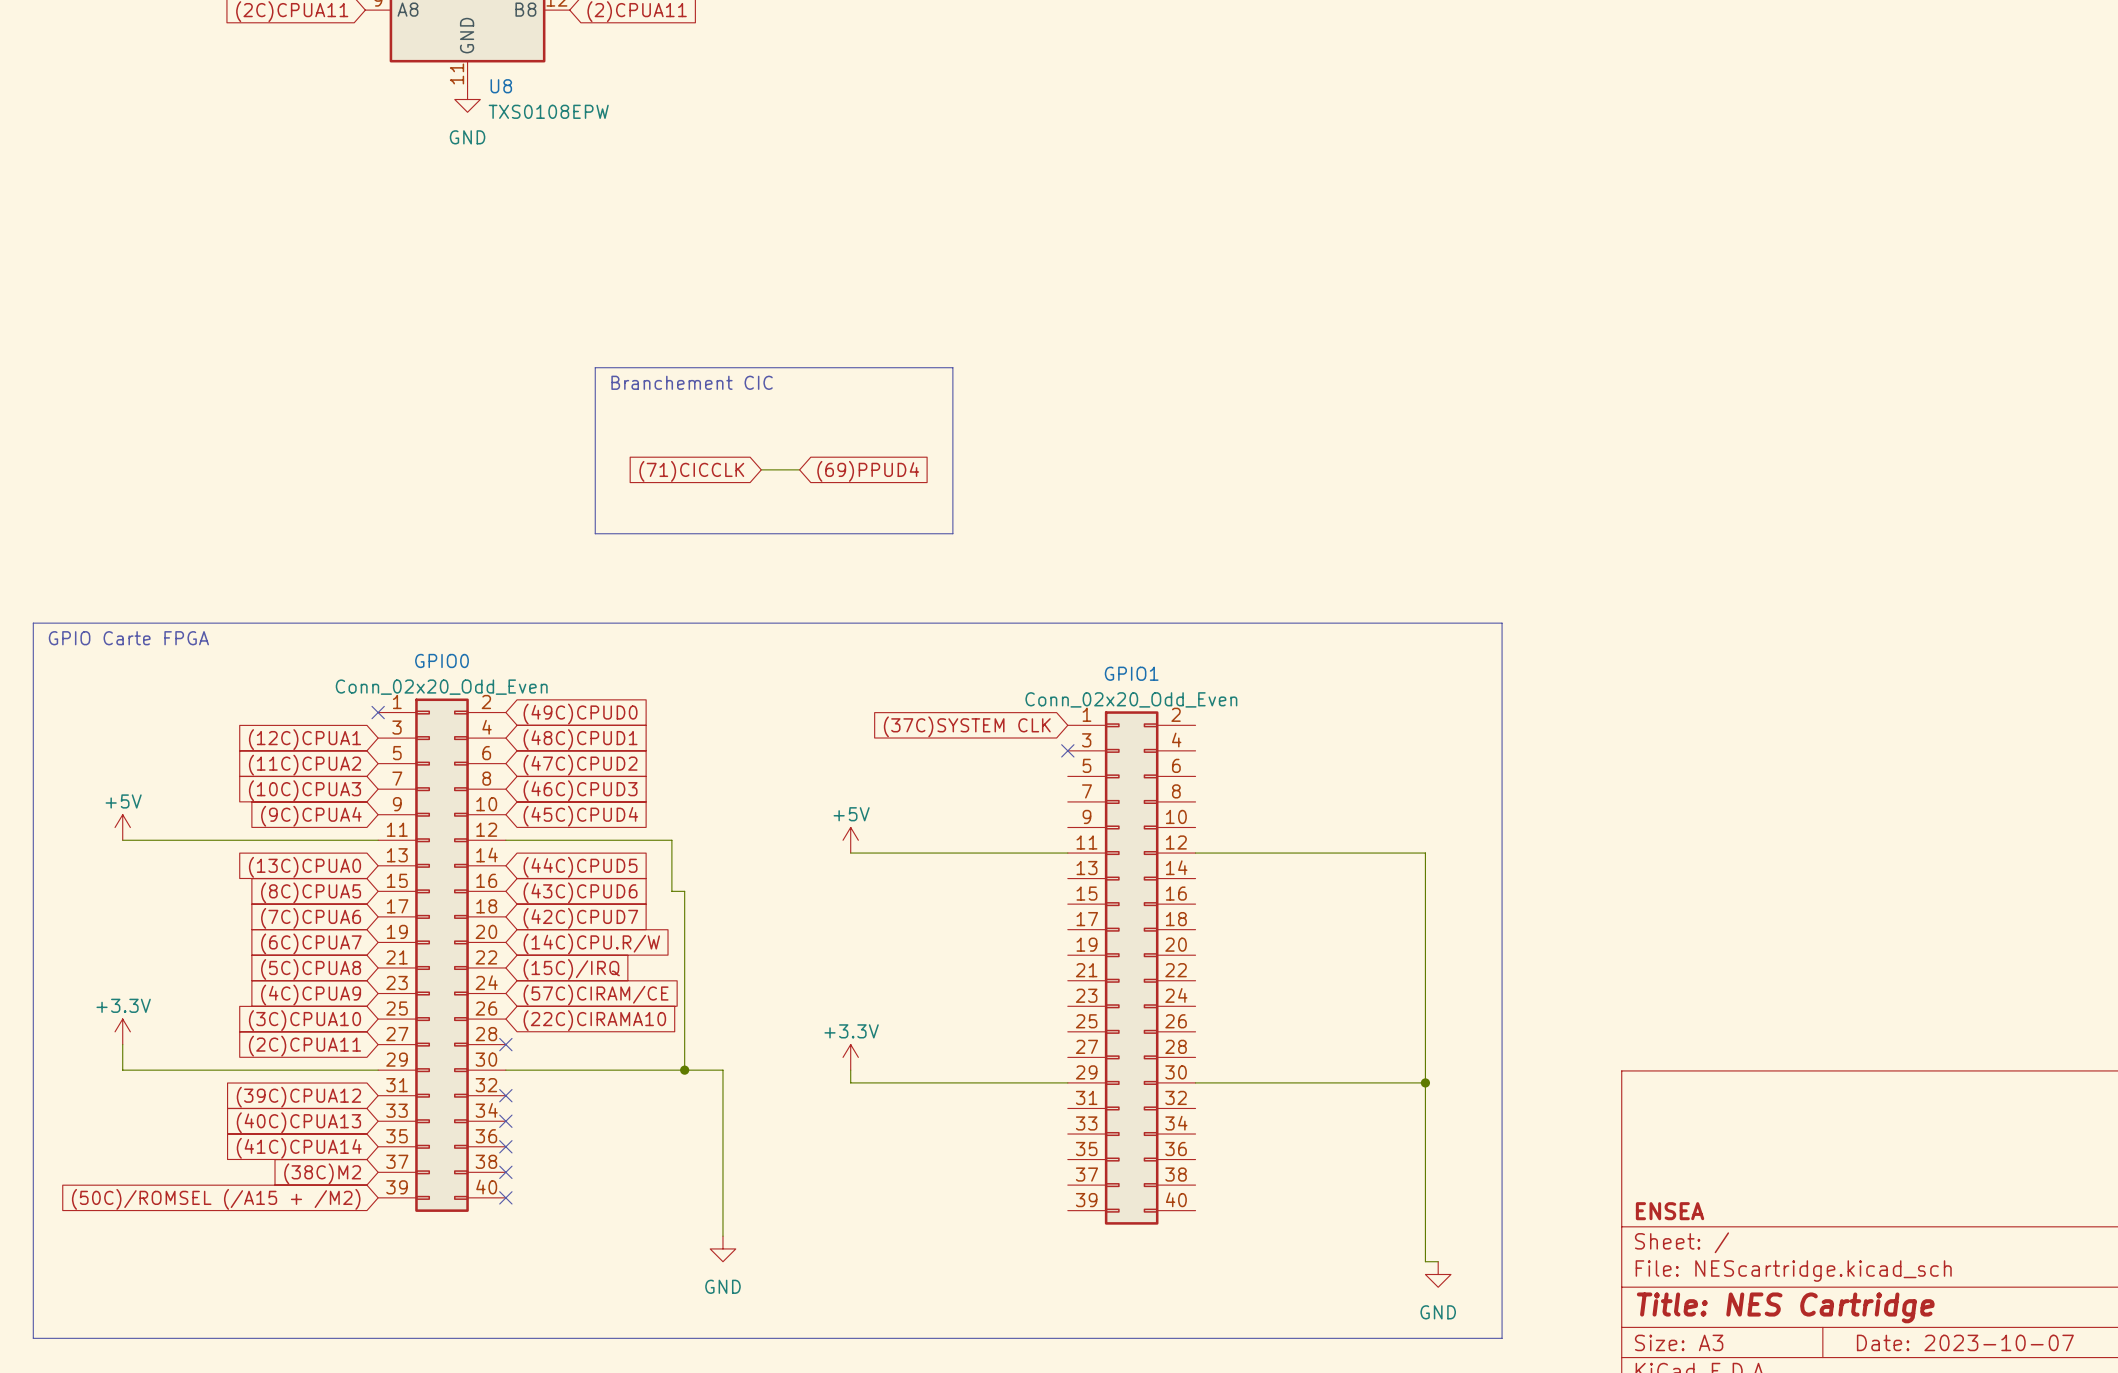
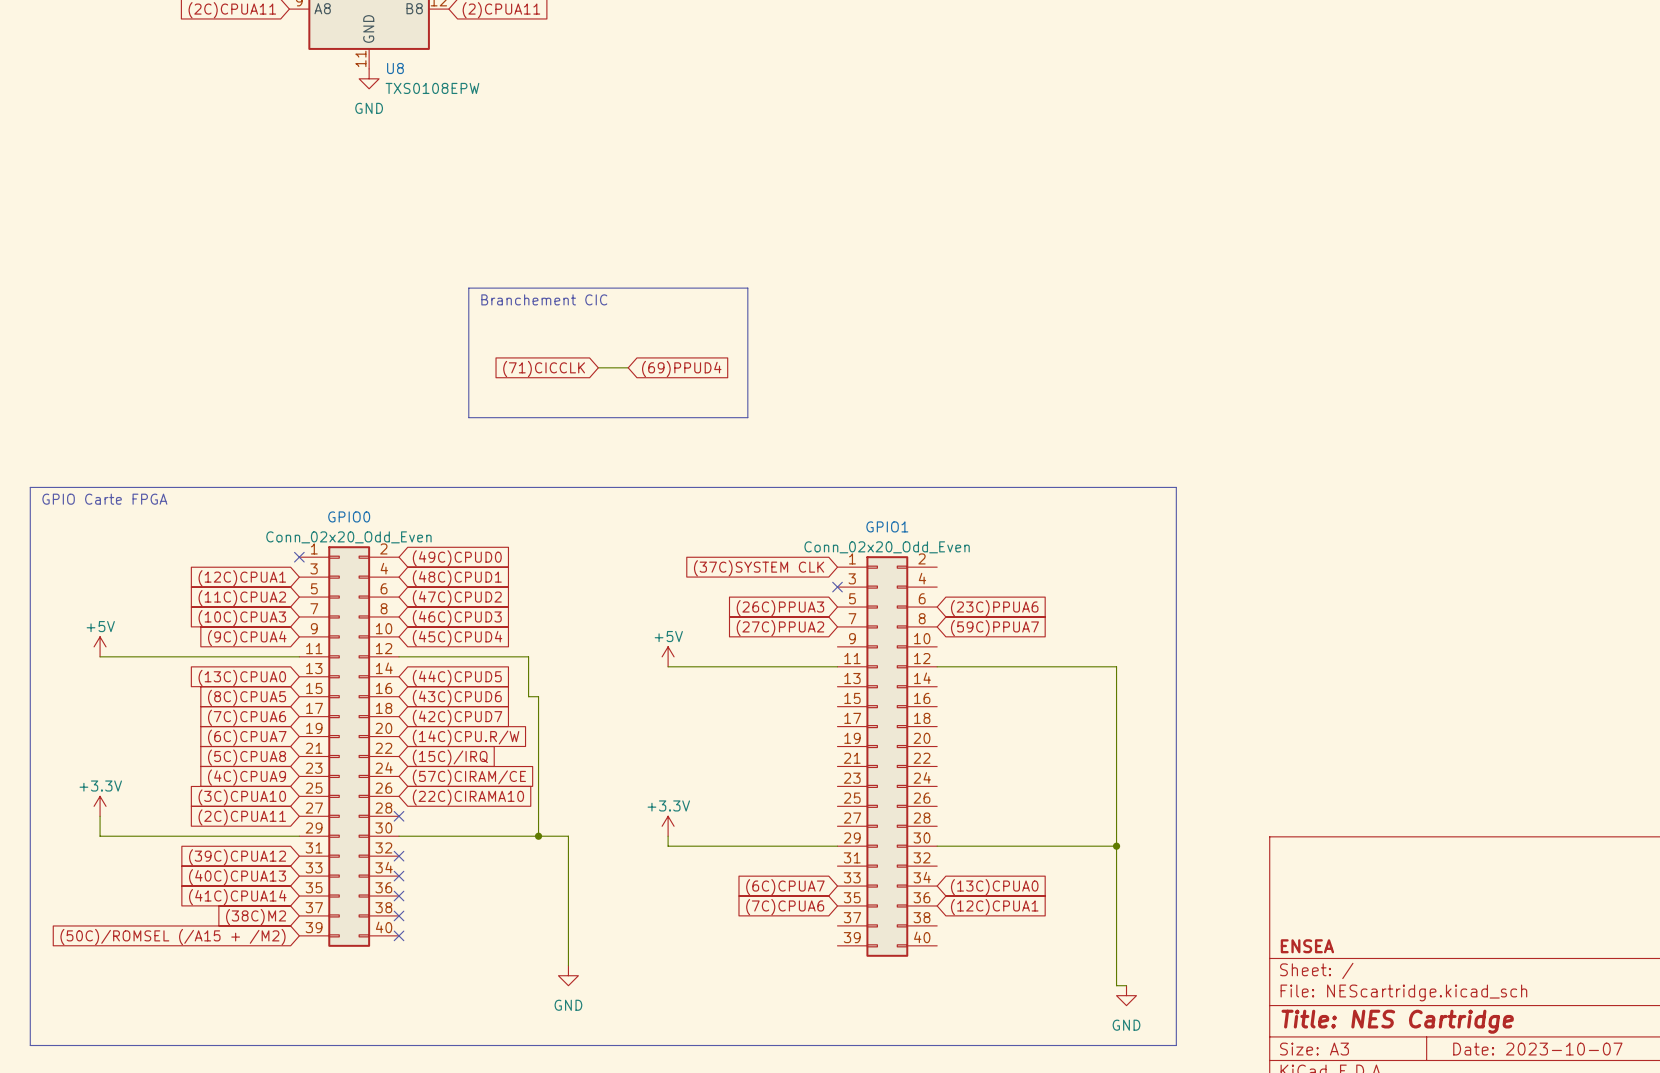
global label: none -> (26C)PPUA3 (780, 608)
global label: none -> (23C)PPUA6 (994, 608)
global label: none -> (27C)PPUA2 (780, 628)
global label: none -> (59C)PPUA7 (994, 628)
global label: none -> (6C)CPUA7 (785, 887)
global label: none -> (13C)CPUA0 (994, 887)
global label: none -> (7C)CPUA6 (785, 907)
global label: none -> (12C)CPUA1 (994, 907)

